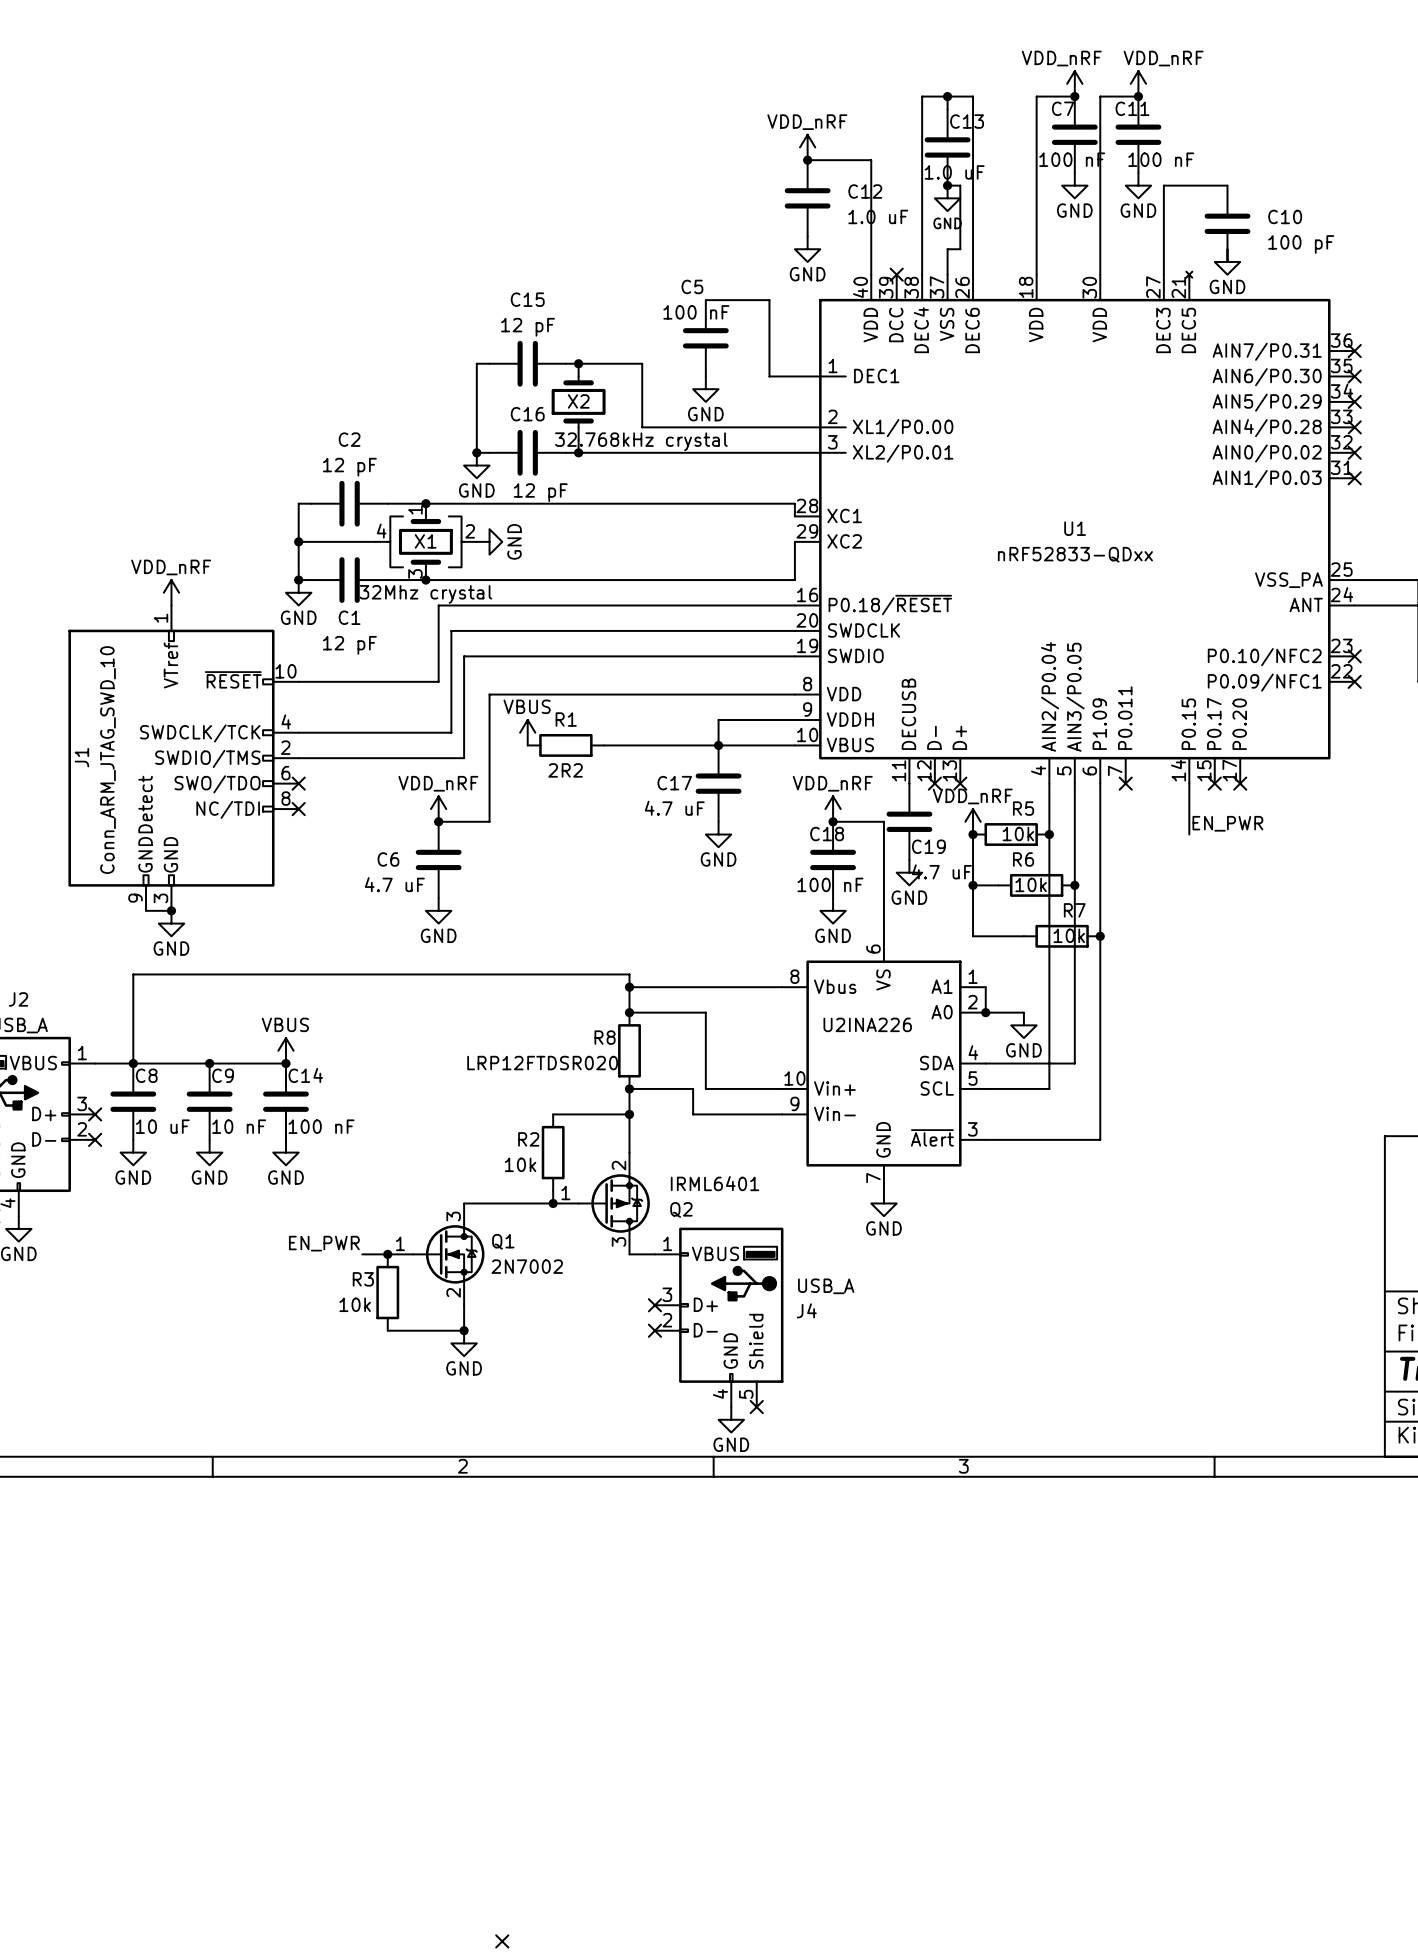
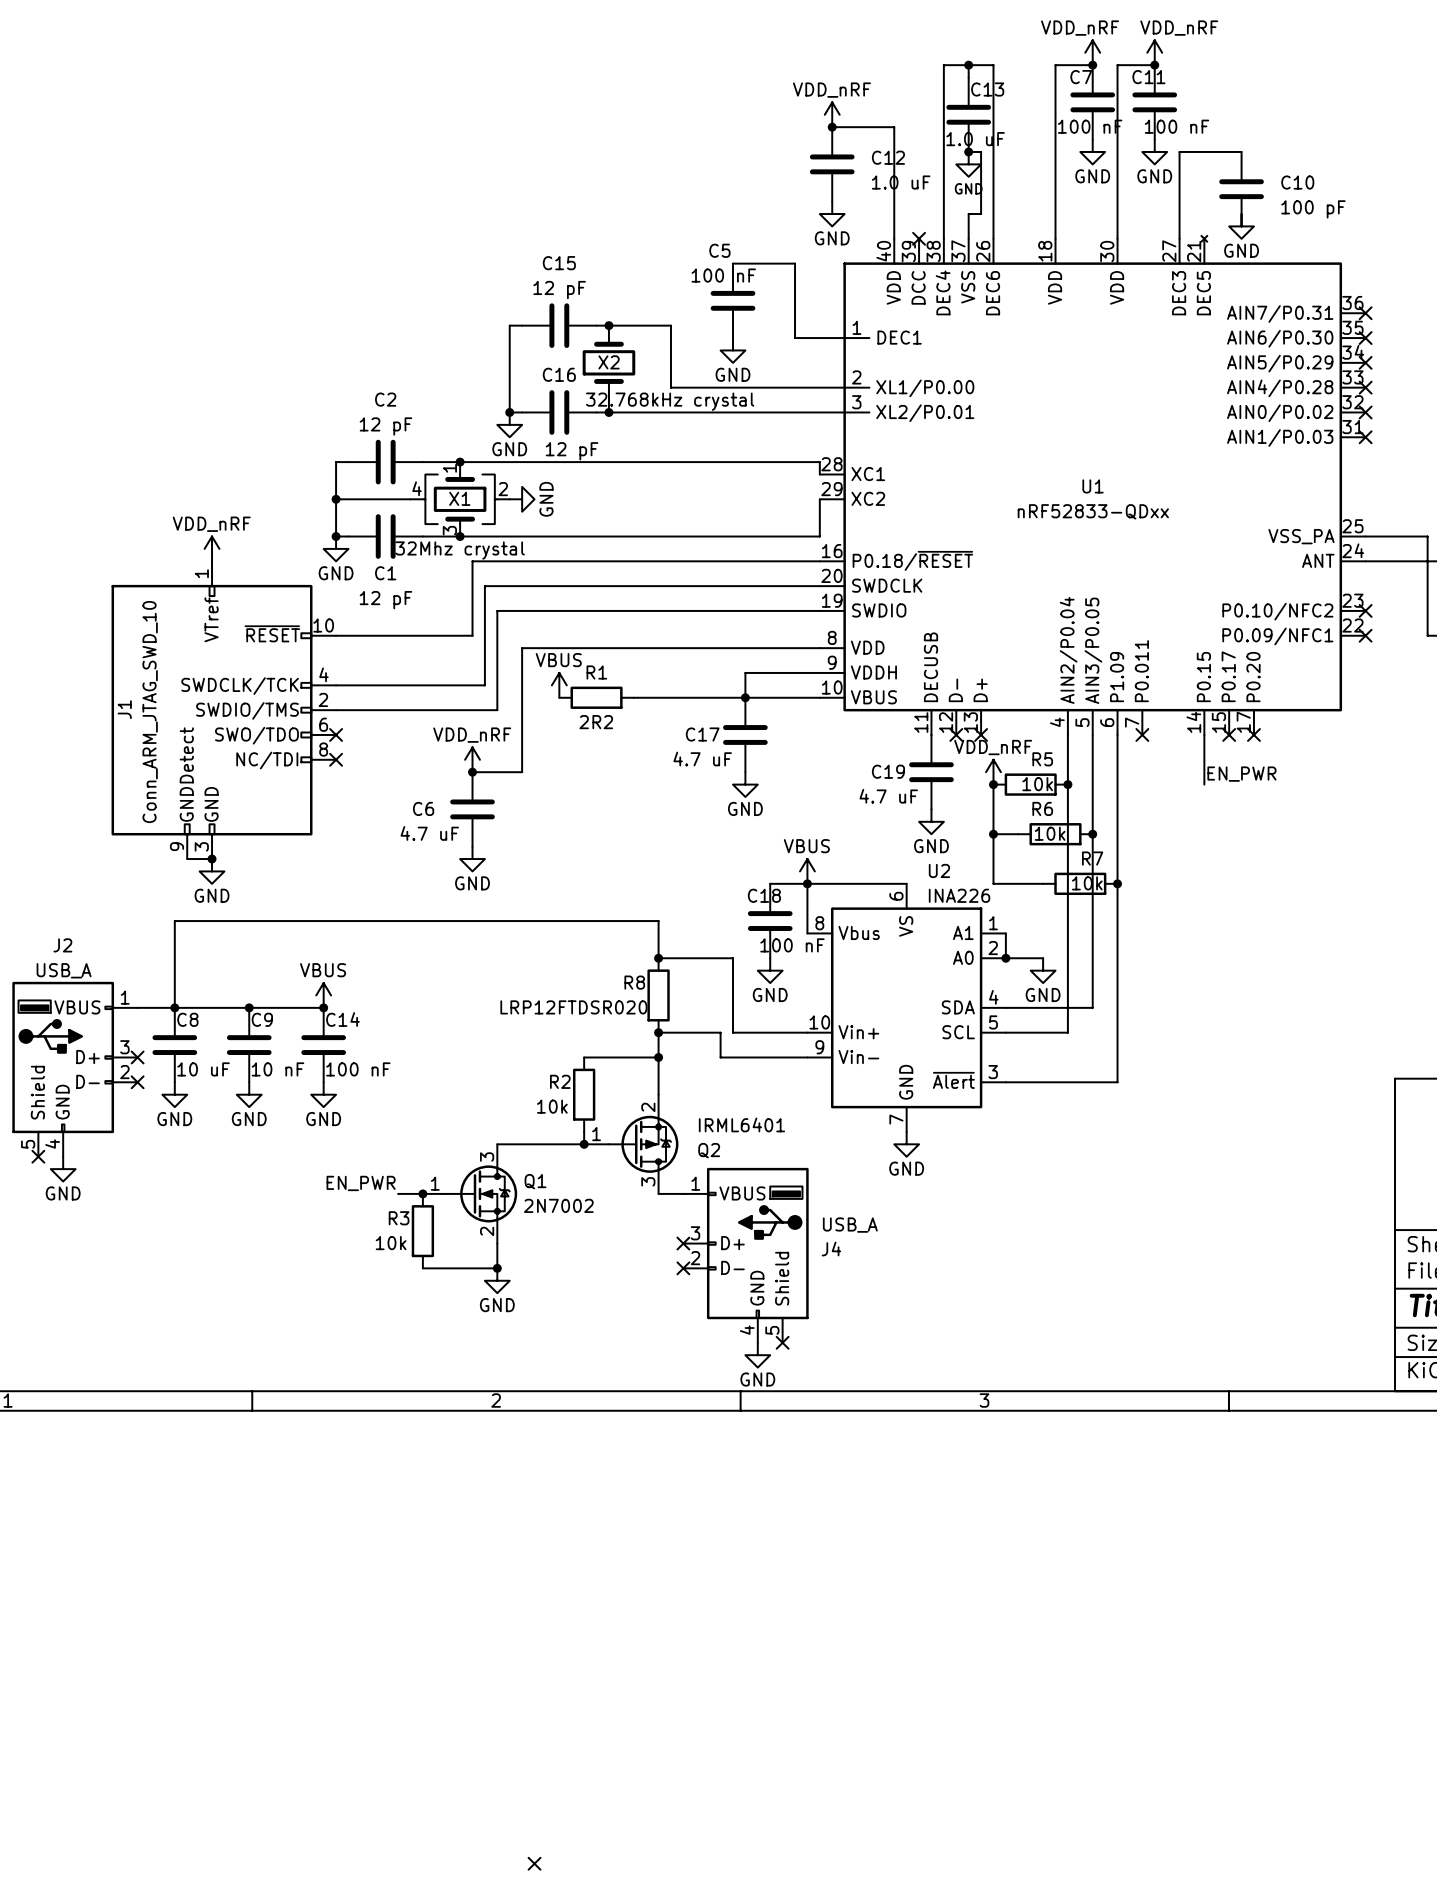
power symbol: VDD_nRF (833, 809) -> none
wire: (833, 821) (883, 821) (883, 936) -> (770, 883) (906, 883)
junction: (833, 821) -> none
C19 name position: C19 (928, 846) -> C19 (888, 771)
C18 position: (833, 859) -> (770, 921)
C19 value position: 4.7 uF (941, 871) -> 4.7 uF (888, 796)
C18 value position: 100 nF (830, 884) -> 100 nF (792, 945)
power symbol position: GND (833, 910) -> GND (770, 970)
power symbol: none -> VBUS (807, 871)
junction: none -> (807, 883)
wire: (629, 987) (782, 987) -> (807, 883) (807, 933)
junction: (629, 987) -> none
U2 name position: U2 (834, 1024) -> U2 (939, 870)
U2 value position: INA226 (880, 1024) -> INA226 (959, 895)

